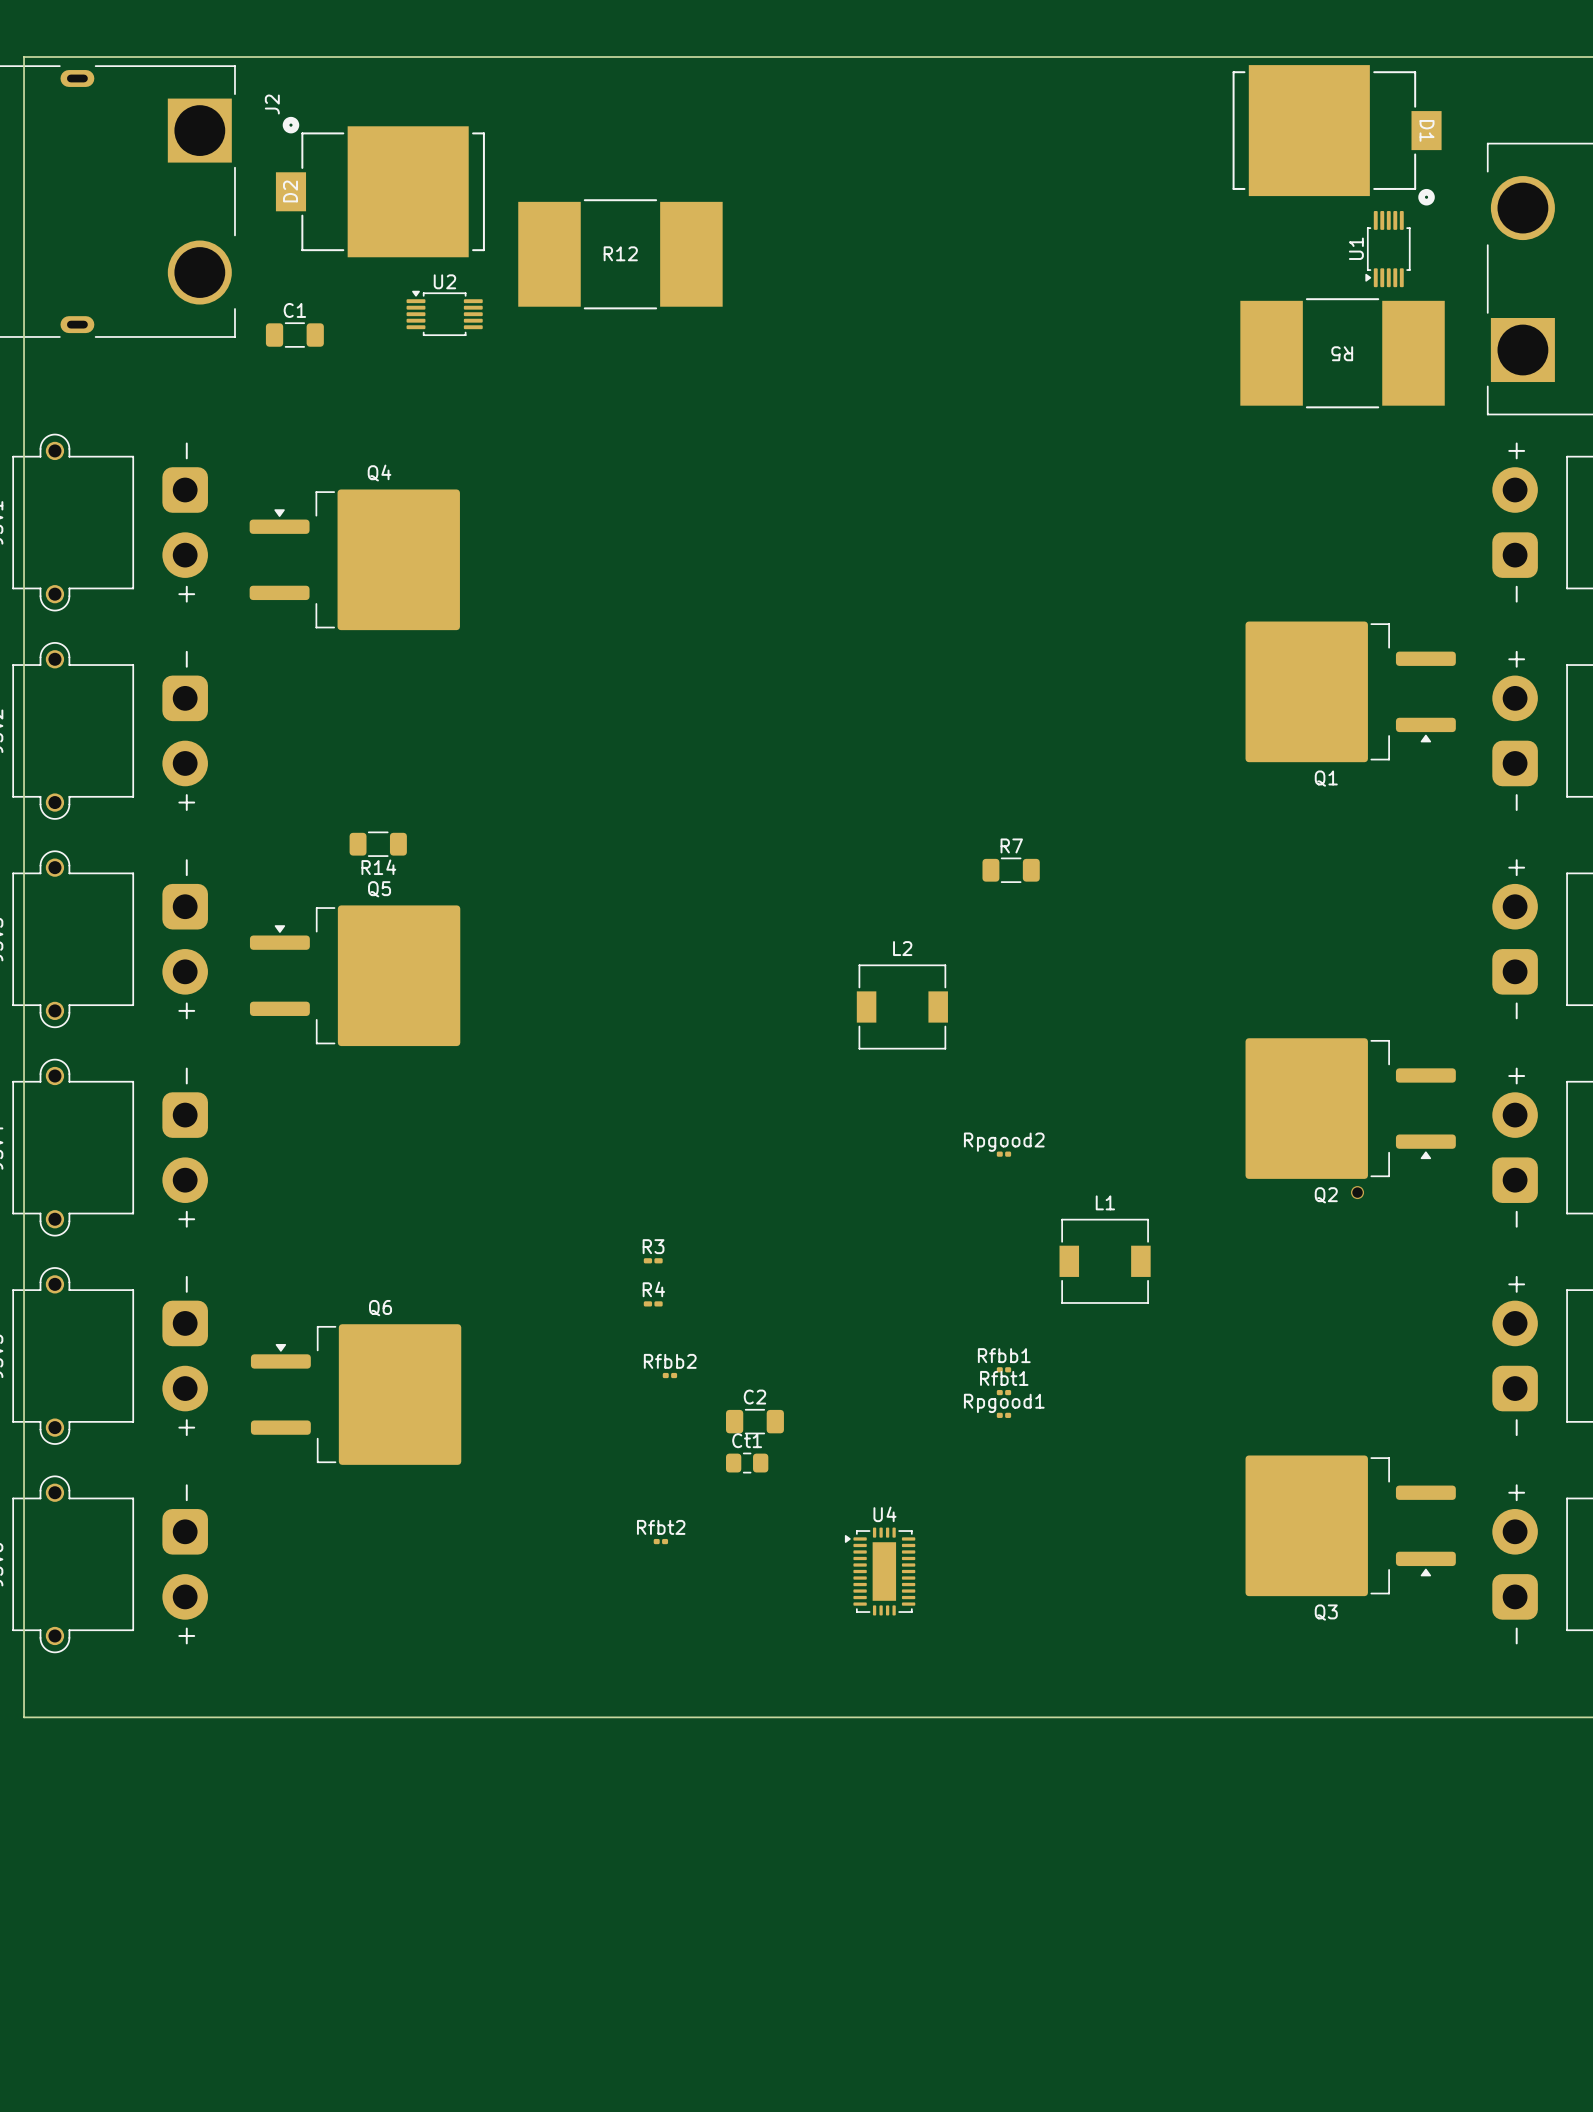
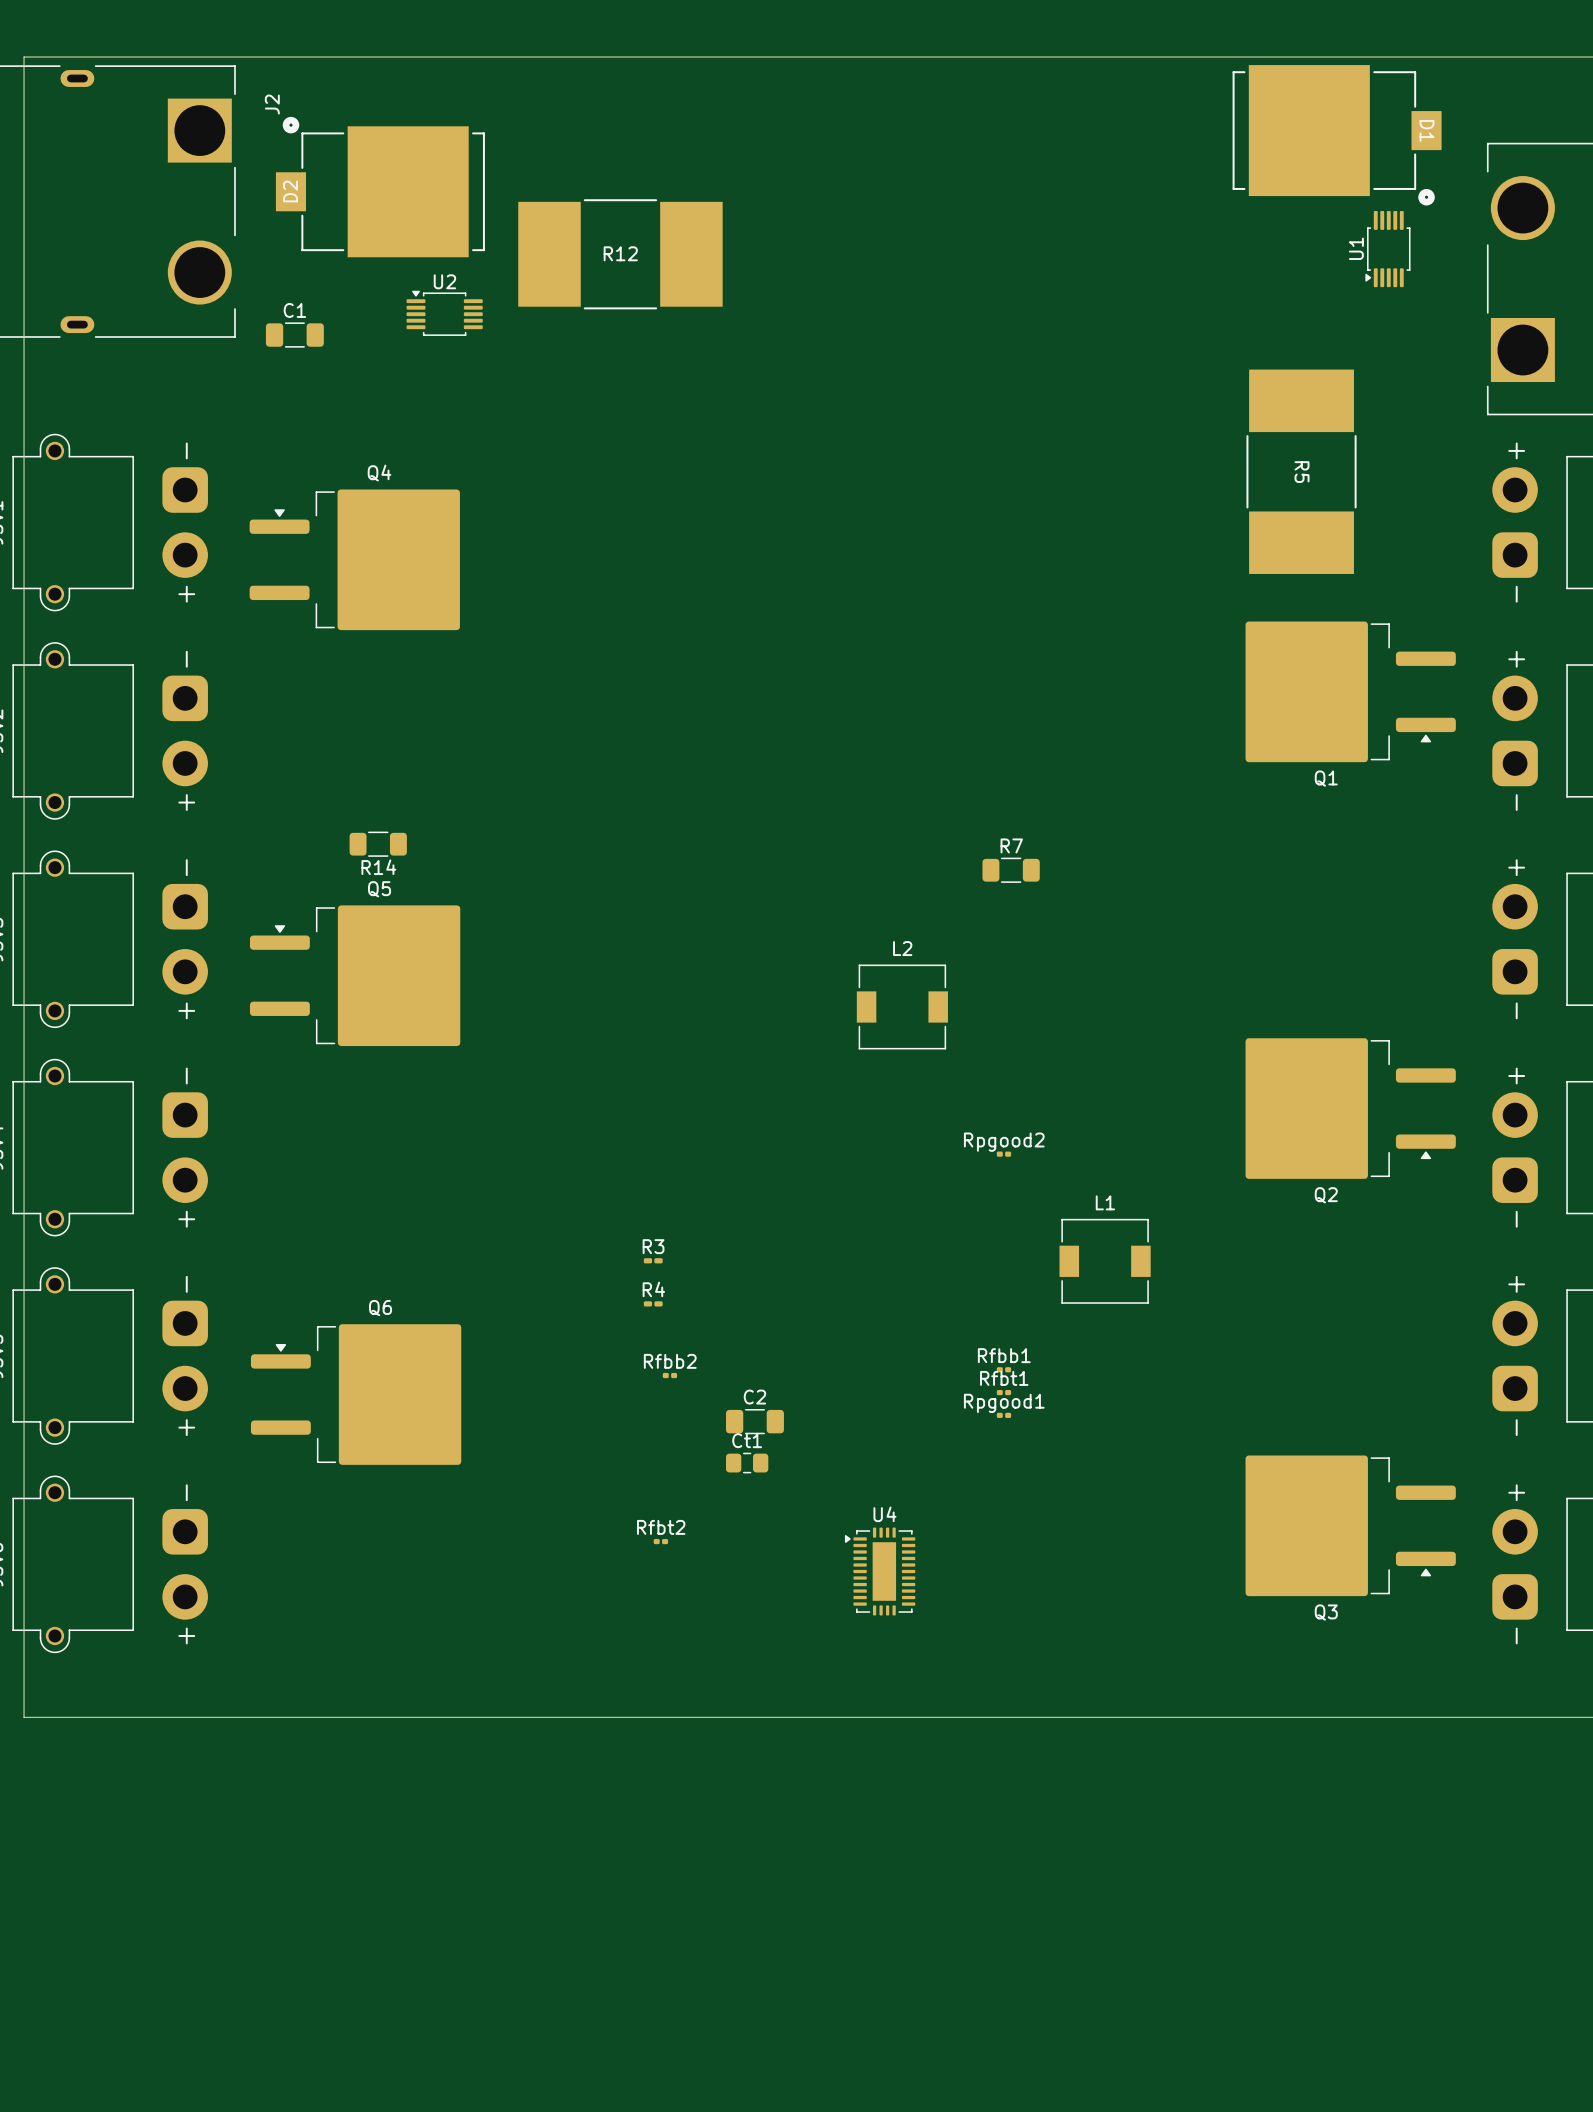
R5 rotation: 0° (1342, 353) -> 90° clockwise (1301, 471)
R5 position: (1342, 353) -> (1301, 471)
via: (1357, 1192) -> none

